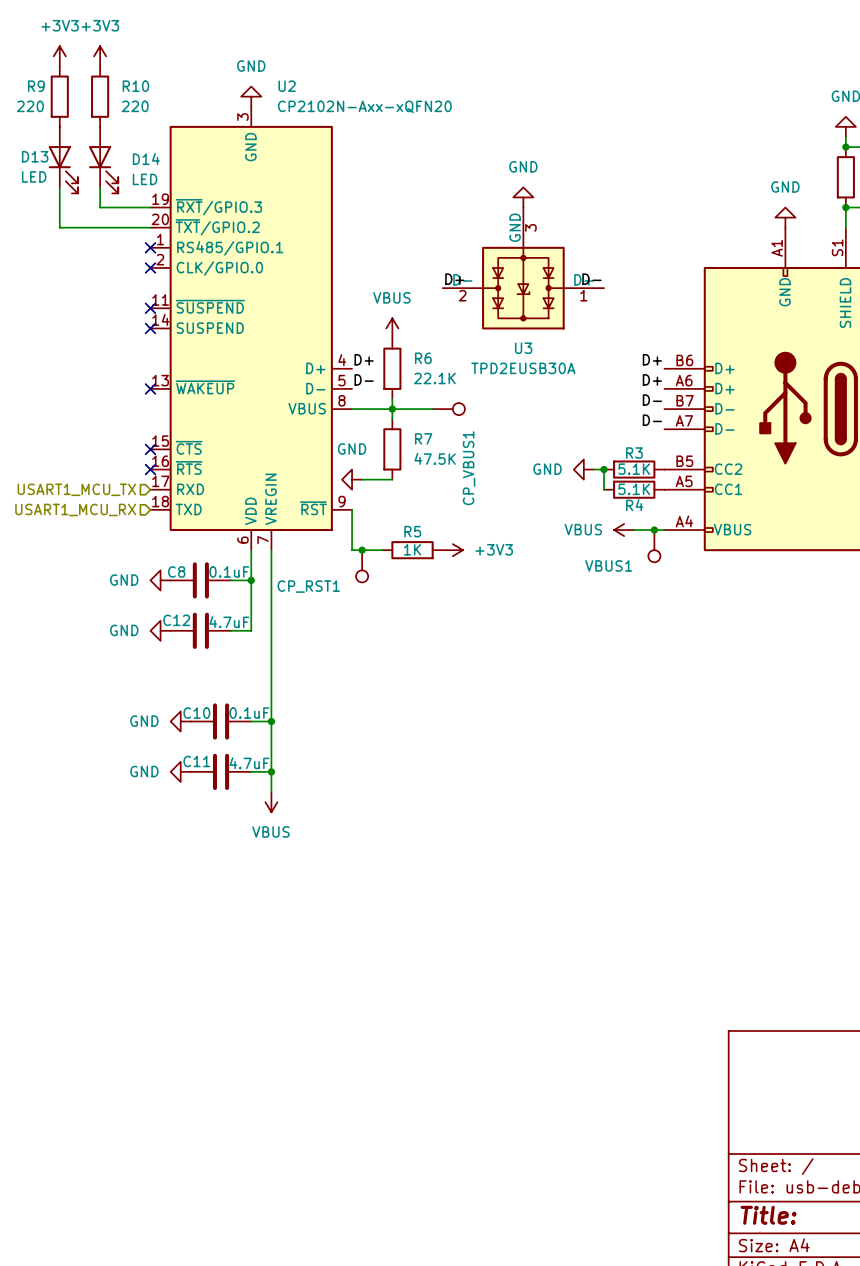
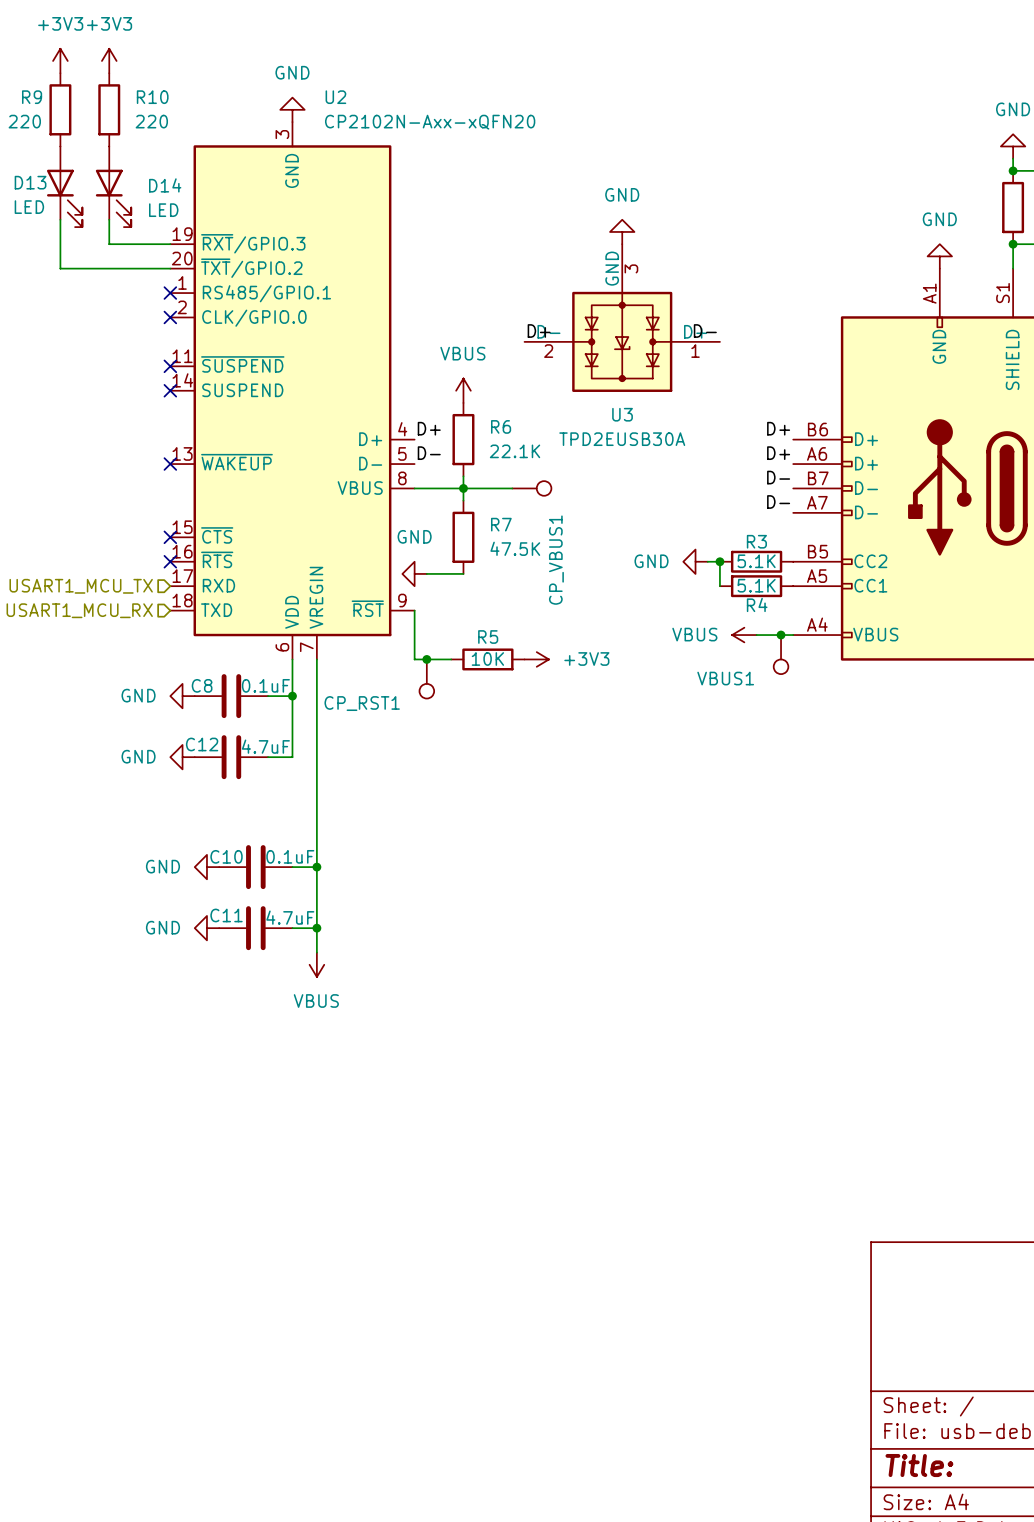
R5 value: 1K (412, 549) -> 10K (487, 659)

